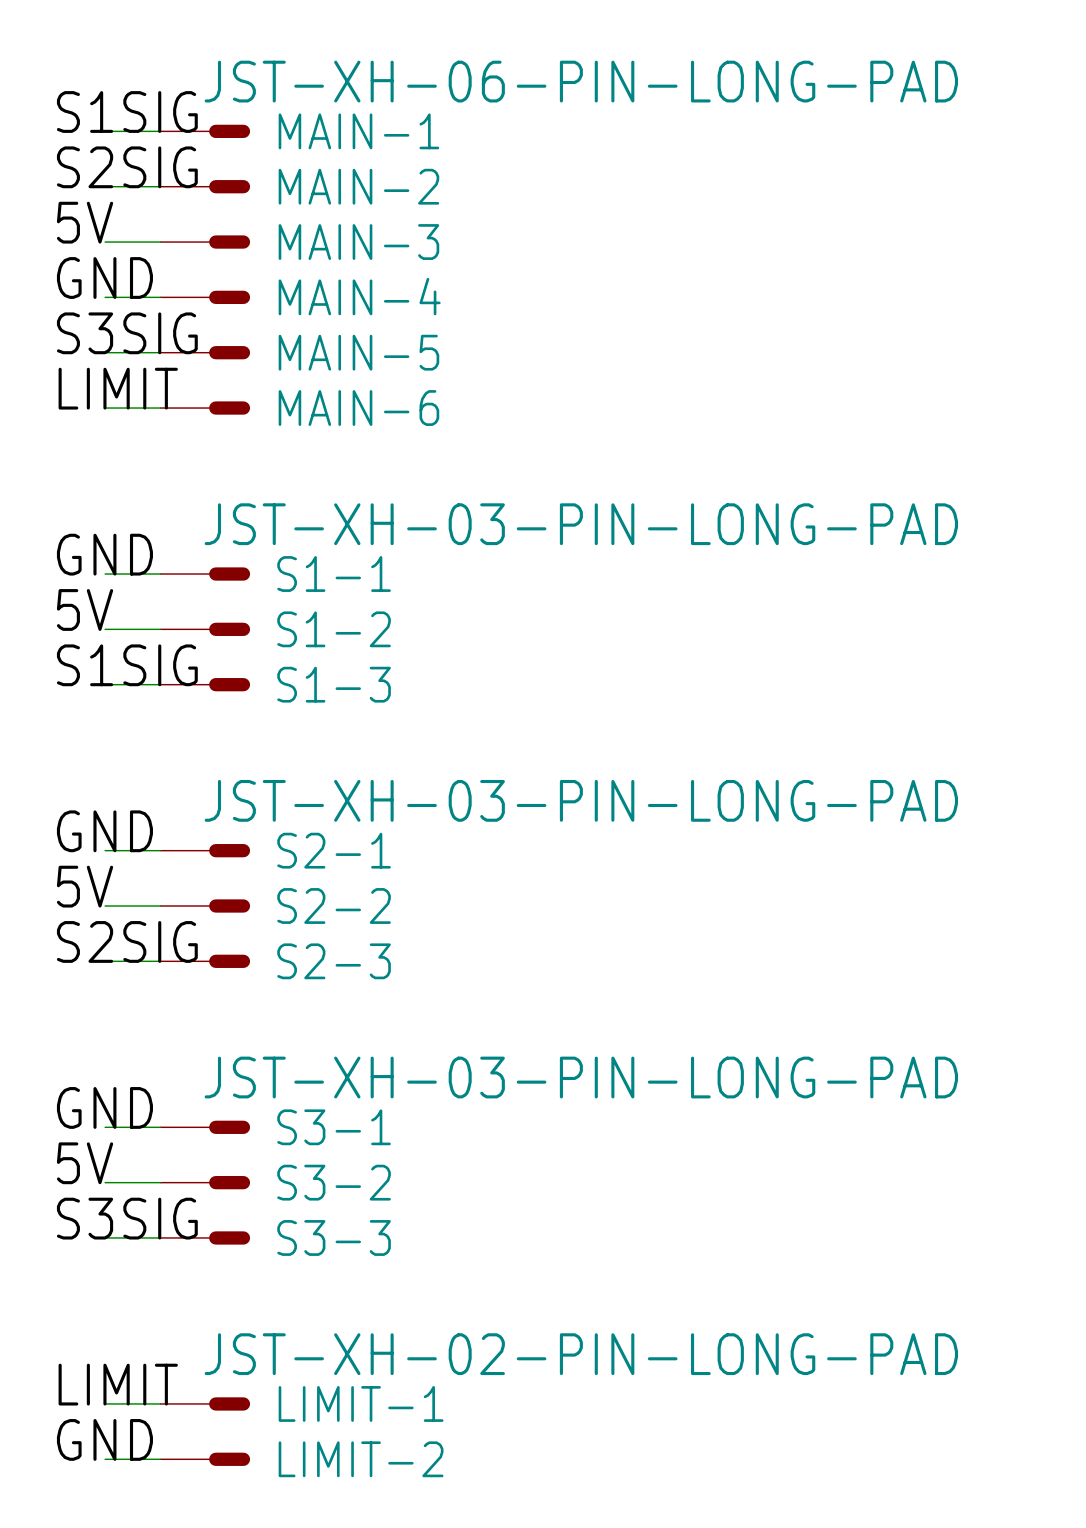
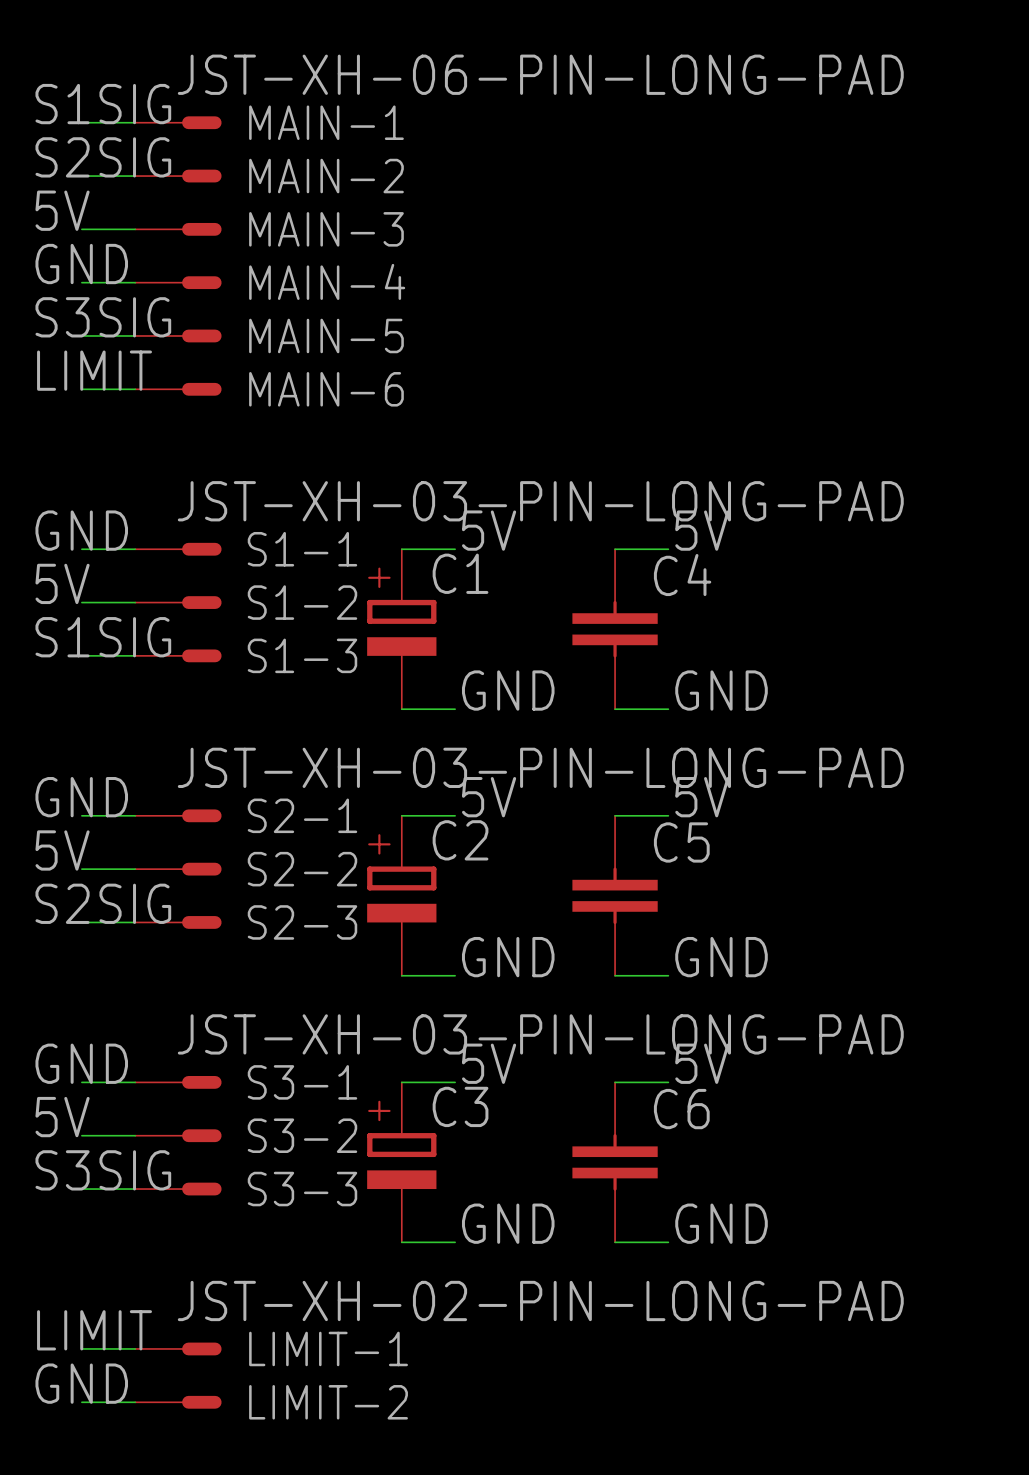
label: none -> 5V (489, 530)
label: none -> 5V (702, 530)
wire: none -> (401, 549) (455, 549)
wire: none -> (615, 549) (668, 549)
C1: none -> (401, 629)
C4: none -> (615, 629)
label: none -> GND (508, 690)
label: none -> GND (721, 690)
wire: none -> (401, 709) (455, 709)
wire: none -> (615, 709) (668, 709)
label: none -> 5V (489, 797)
label: none -> 5V (702, 797)
wire: none -> (401, 815) (455, 815)
wire: none -> (615, 815) (668, 815)
C2: none -> (401, 895)
C5: none -> (615, 895)
label: none -> GND (508, 957)
label: none -> GND (721, 957)
wire: none -> (401, 975) (455, 975)
wire: none -> (615, 975) (668, 975)
label: none -> 5V (489, 1063)
label: none -> 5V (702, 1063)
wire: none -> (401, 1082) (455, 1082)
wire: none -> (615, 1082) (668, 1082)
C3: none -> (401, 1162)
C6: none -> (615, 1162)
label: none -> GND (508, 1223)
label: none -> GND (721, 1223)
wire: none -> (401, 1242) (455, 1242)
wire: none -> (615, 1242) (668, 1242)

